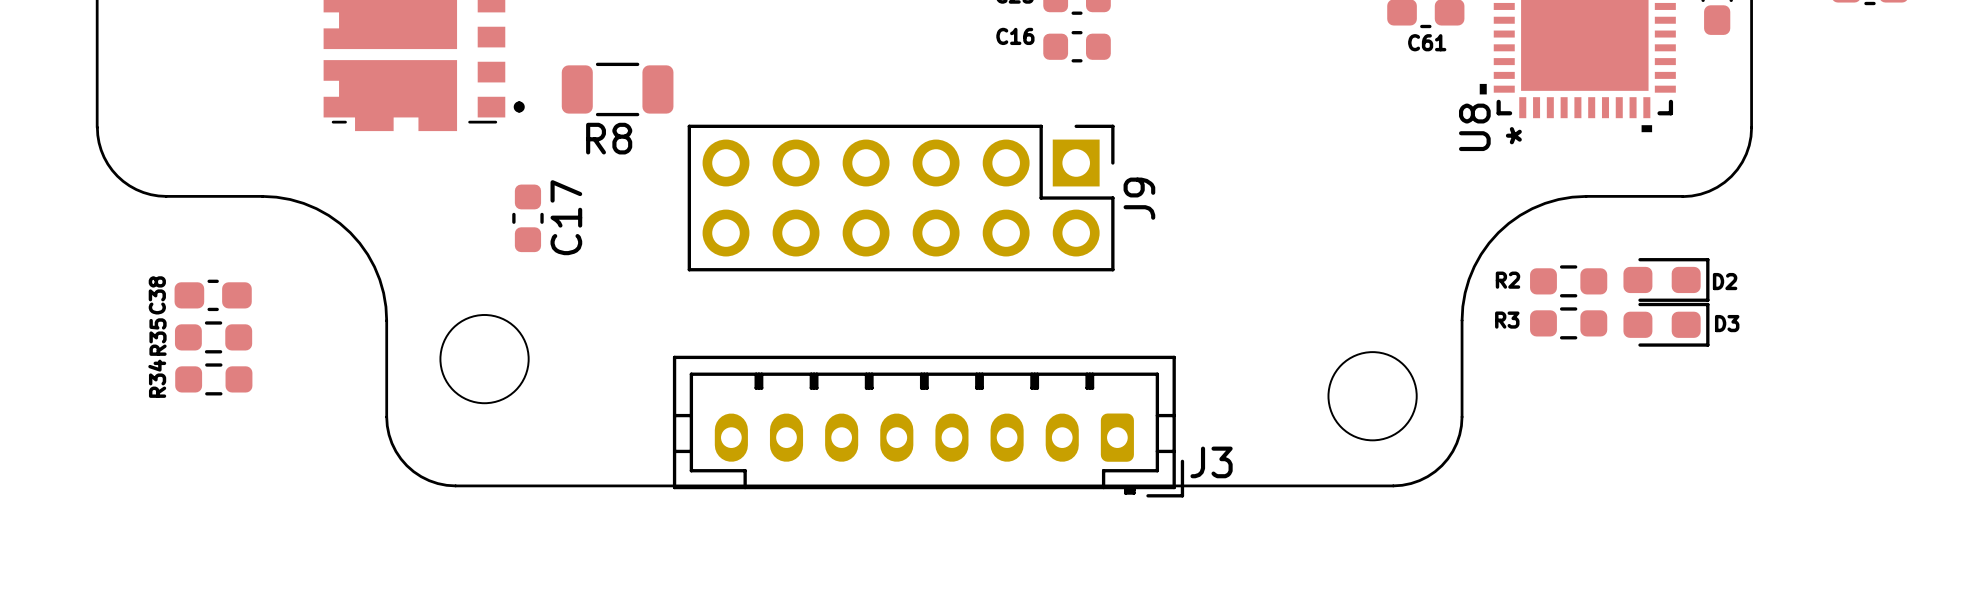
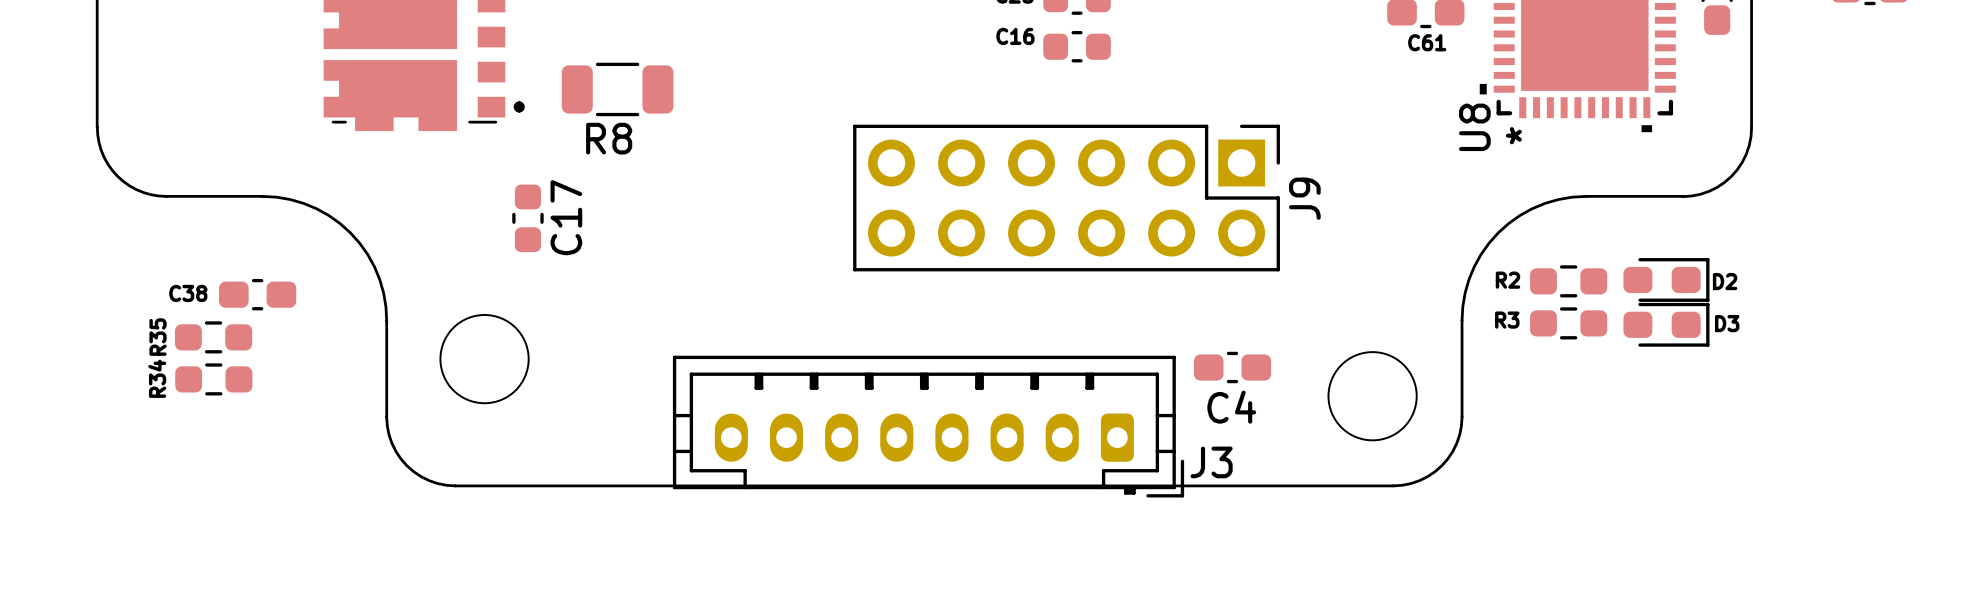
J9 position: (901, 198) -> (1066, 198)
C38 name rotation: 0° (157, 295) -> 90° clockwise (188, 293)
C38 position: (213, 295) -> (257, 294)
C4: none -> (1232, 367)

